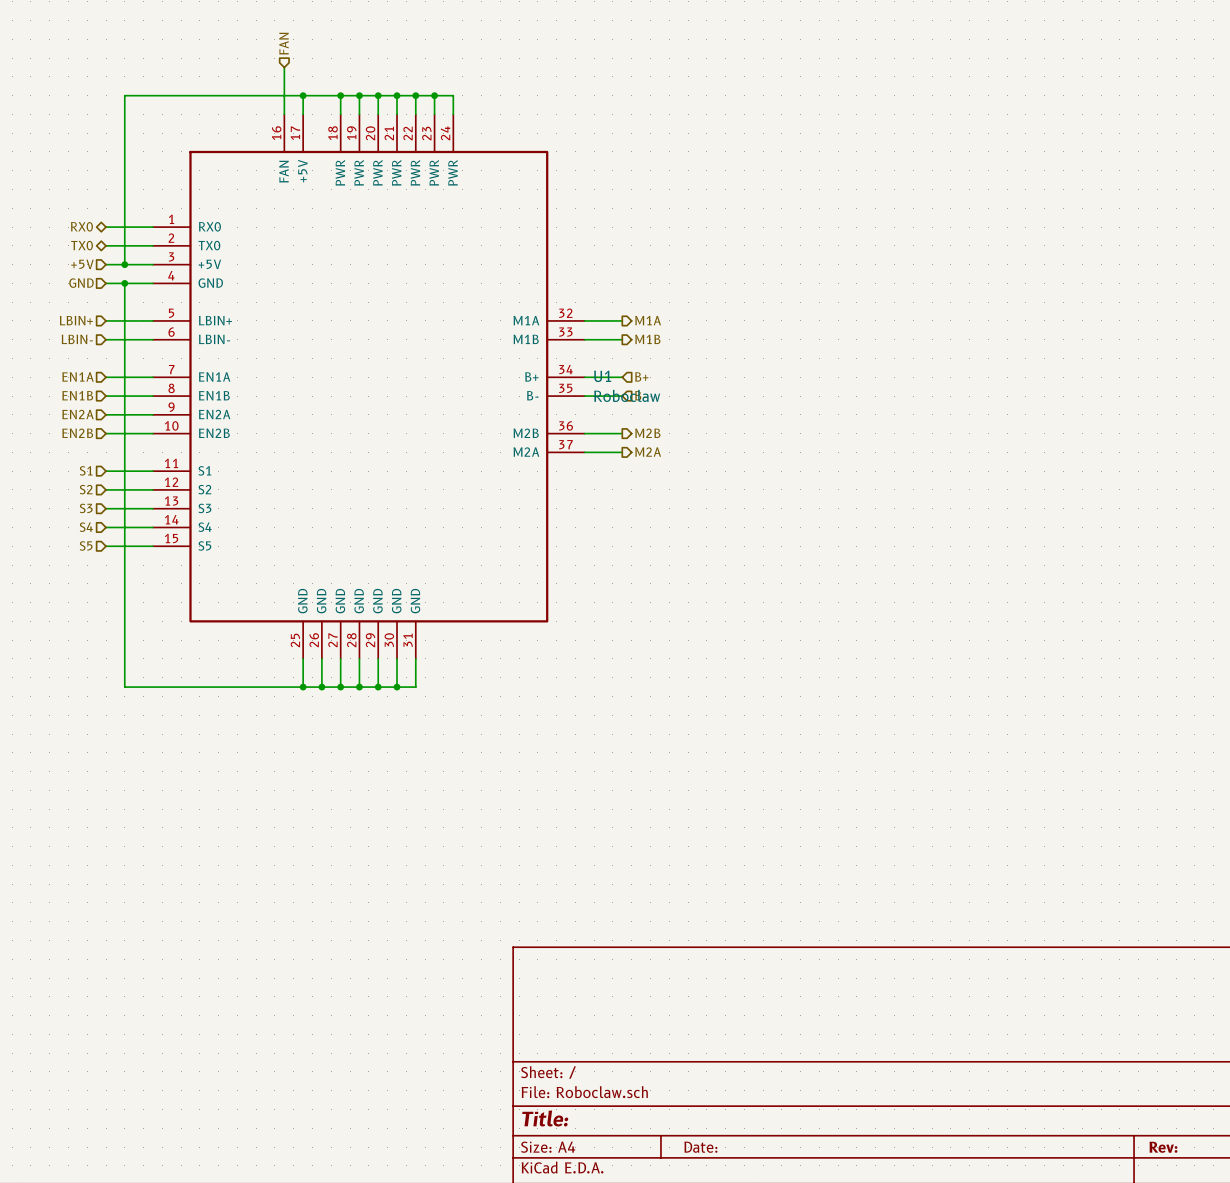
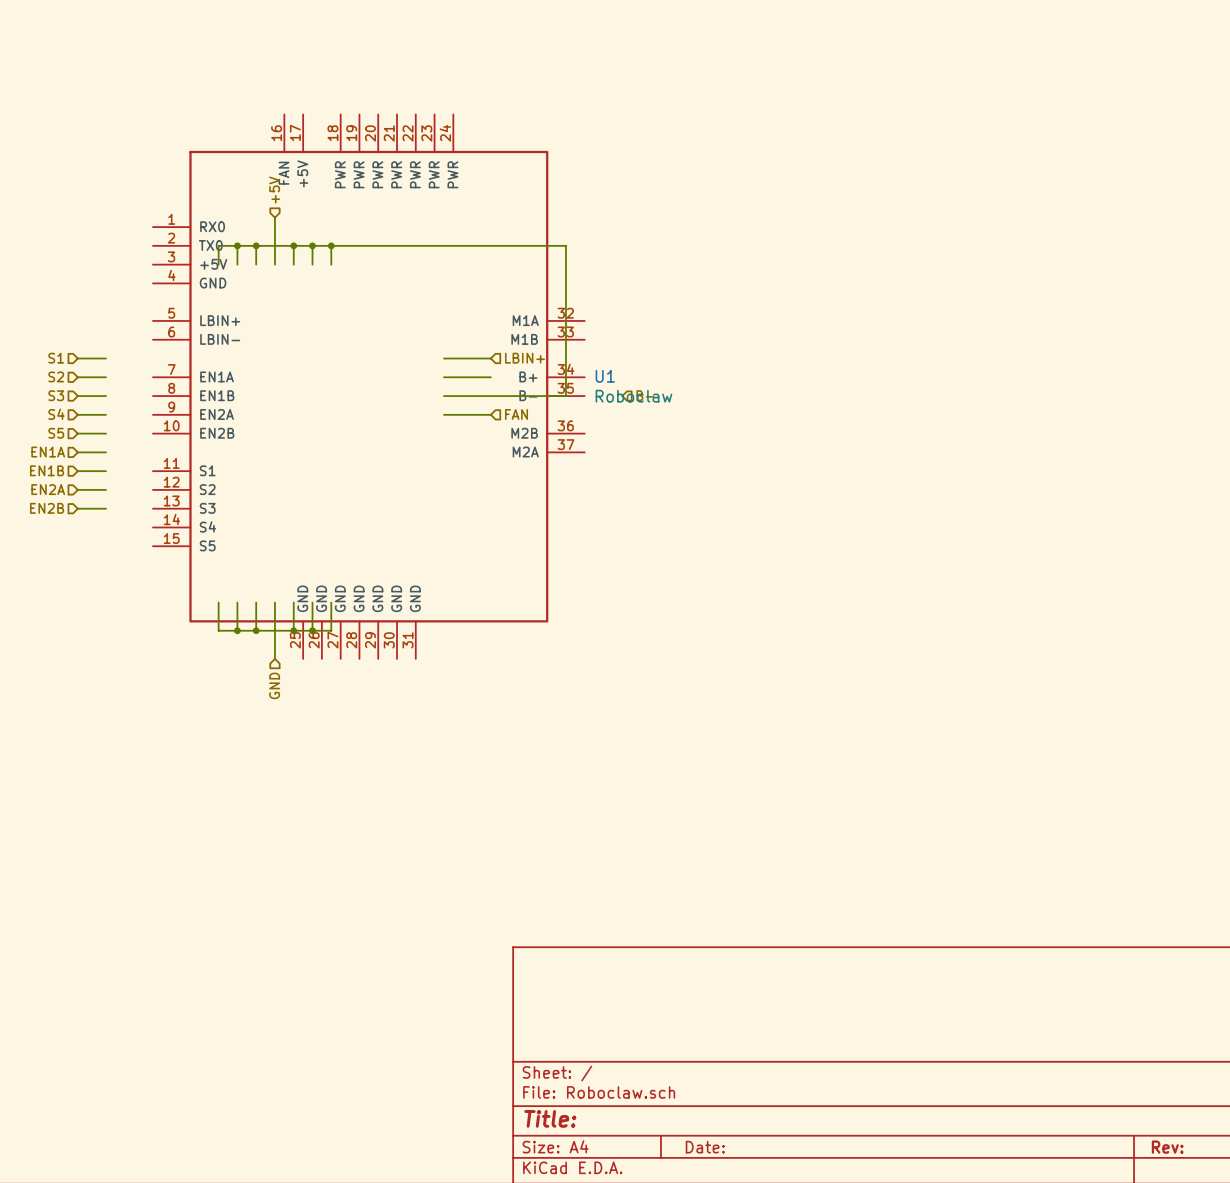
hierarchical label: FAN (284, 43) -> none
wire: (284, 67) (284, 114) -> (274, 217) (274, 264)
wire: (303, 95) (303, 114) -> none
junction: (303, 95) -> none
wire: (340, 95) (340, 114) -> (237, 245) (237, 264)
junction: (340, 95) -> none
wire: (359, 95) (359, 114) -> (256, 245) (256, 264)
junction: (359, 95) -> none
wire: (378, 95) (378, 114) -> none
junction: (378, 95) -> none
wire: (397, 95) (397, 114) -> (293, 245) (293, 264)
junction: (397, 95) -> none
wire: (415, 95) (415, 114) -> (312, 245) (312, 264)
junction: (415, 95) -> none
wire: (434, 95) (434, 114) -> (331, 245) (331, 264)
junction: (434, 95) -> none
wire: (453, 114) (453, 95) (124, 95) (124, 264) -> none
hierarchical label: none -> +5V (274, 190)
hierarchical label: RX0 (81, 226) -> none
wire: (106, 227) (152, 227) -> none
hierarchical label: TX0 (82, 245) -> none
wire: (106, 245) (152, 245) -> none
junction: none -> (237, 245)
junction: none -> (256, 245)
junction: none -> (293, 245)
junction: none -> (312, 245)
junction: none -> (331, 245)
hierarchical label: +5V (82, 264) -> none
wire: (106, 264) (152, 264) -> none
junction: (124, 264) -> none
wire: none -> (218, 264) (218, 245) (565, 245) (565, 396) (443, 396)
hierarchical label: GND (81, 283) -> none
wire: (106, 283) (152, 283) -> none
wire: (124, 283) (124, 687) (415, 687) (415, 658) -> none
junction: (124, 283) -> none
hierarchical label: LBIN+ (76, 320) -> none
wire: (106, 320) (152, 320) -> none
wire: (584, 320) (622, 320) -> none
hierarchical label: M1A (648, 320) -> none
hierarchical label: LBIN- (77, 339) -> none
wire: (106, 339) (152, 339) -> none
wire: (584, 339) (622, 339) -> none
hierarchical label: M1B (647, 339) -> none
wire: none -> (77, 358) (106, 358)
wire: none -> (443, 358) (490, 358)
hierarchical label: none -> LBIN+ (524, 358)
hierarchical label position: EN1A (78, 376) -> EN1A (48, 452)
hierarchical label: B+ (641, 376) -> none
wire: (106, 377) (152, 377) -> (106, 377) (77, 377)
wire: none -> (443, 377) (490, 377)
wire: (584, 377) (622, 377) -> none
hierarchical label position: EN1B (77, 395) -> EN1B (47, 470)
wire: (106, 396) (152, 396) -> (106, 396) (77, 396)
wire: (584, 396) (622, 396) -> none
hierarchical label position: EN2A (78, 414) -> EN2A (48, 489)
wire: (106, 414) (152, 414) -> (106, 414) (77, 414)
wire: none -> (443, 414) (490, 414)
hierarchical label: none -> FAN (516, 414)
hierarchical label position: EN2B (77, 433) -> EN2B (47, 508)
wire: (106, 433) (152, 433) -> (106, 433) (77, 433)
wire: (584, 433) (622, 433) -> none
hierarchical label: M2B (647, 433) -> none
wire: none -> (77, 452) (106, 452)
wire: (584, 452) (622, 452) -> none
hierarchical label: M2A (648, 452) -> none
hierarchical label position: S1 (86, 470) -> S1 (56, 358)
wire: (106, 471) (152, 471) -> (106, 471) (77, 471)
hierarchical label position: S2 (86, 489) -> S2 (56, 376)
wire: (106, 489) (152, 489) -> (106, 489) (77, 489)
hierarchical label position: S3 (86, 508) -> S3 (56, 395)
wire: (106, 508) (152, 508) -> (106, 508) (77, 508)
hierarchical label position: S4 (86, 527) -> S4 (56, 414)
wire: (106, 527) (152, 527) -> none
hierarchical label position: S5 (86, 545) -> S5 (56, 433)
wire: (106, 546) (152, 546) -> none
wire: none -> (218, 602) (218, 630) (331, 630) (331, 602)
wire: none -> (274, 602) (274, 658)
junction: none -> (237, 630)
junction: none -> (256, 630)
junction: none -> (293, 630)
junction: none -> (312, 630)
wire: (303, 658) (303, 687) -> (237, 602) (237, 630)
wire: (321, 658) (321, 687) -> (256, 602) (256, 630)
wire: (340, 658) (340, 687) -> none
wire: (359, 658) (359, 687) -> (293, 602) (293, 630)
wire: (378, 658) (378, 687) -> (312, 602) (312, 630)
wire: (397, 658) (397, 687) -> none
hierarchical label: none -> GND (274, 685)
junction: (303, 687) -> none
junction: (321, 687) -> none
junction: (340, 687) -> none
junction: (359, 687) -> none
junction: (378, 687) -> none
junction: (397, 687) -> none

